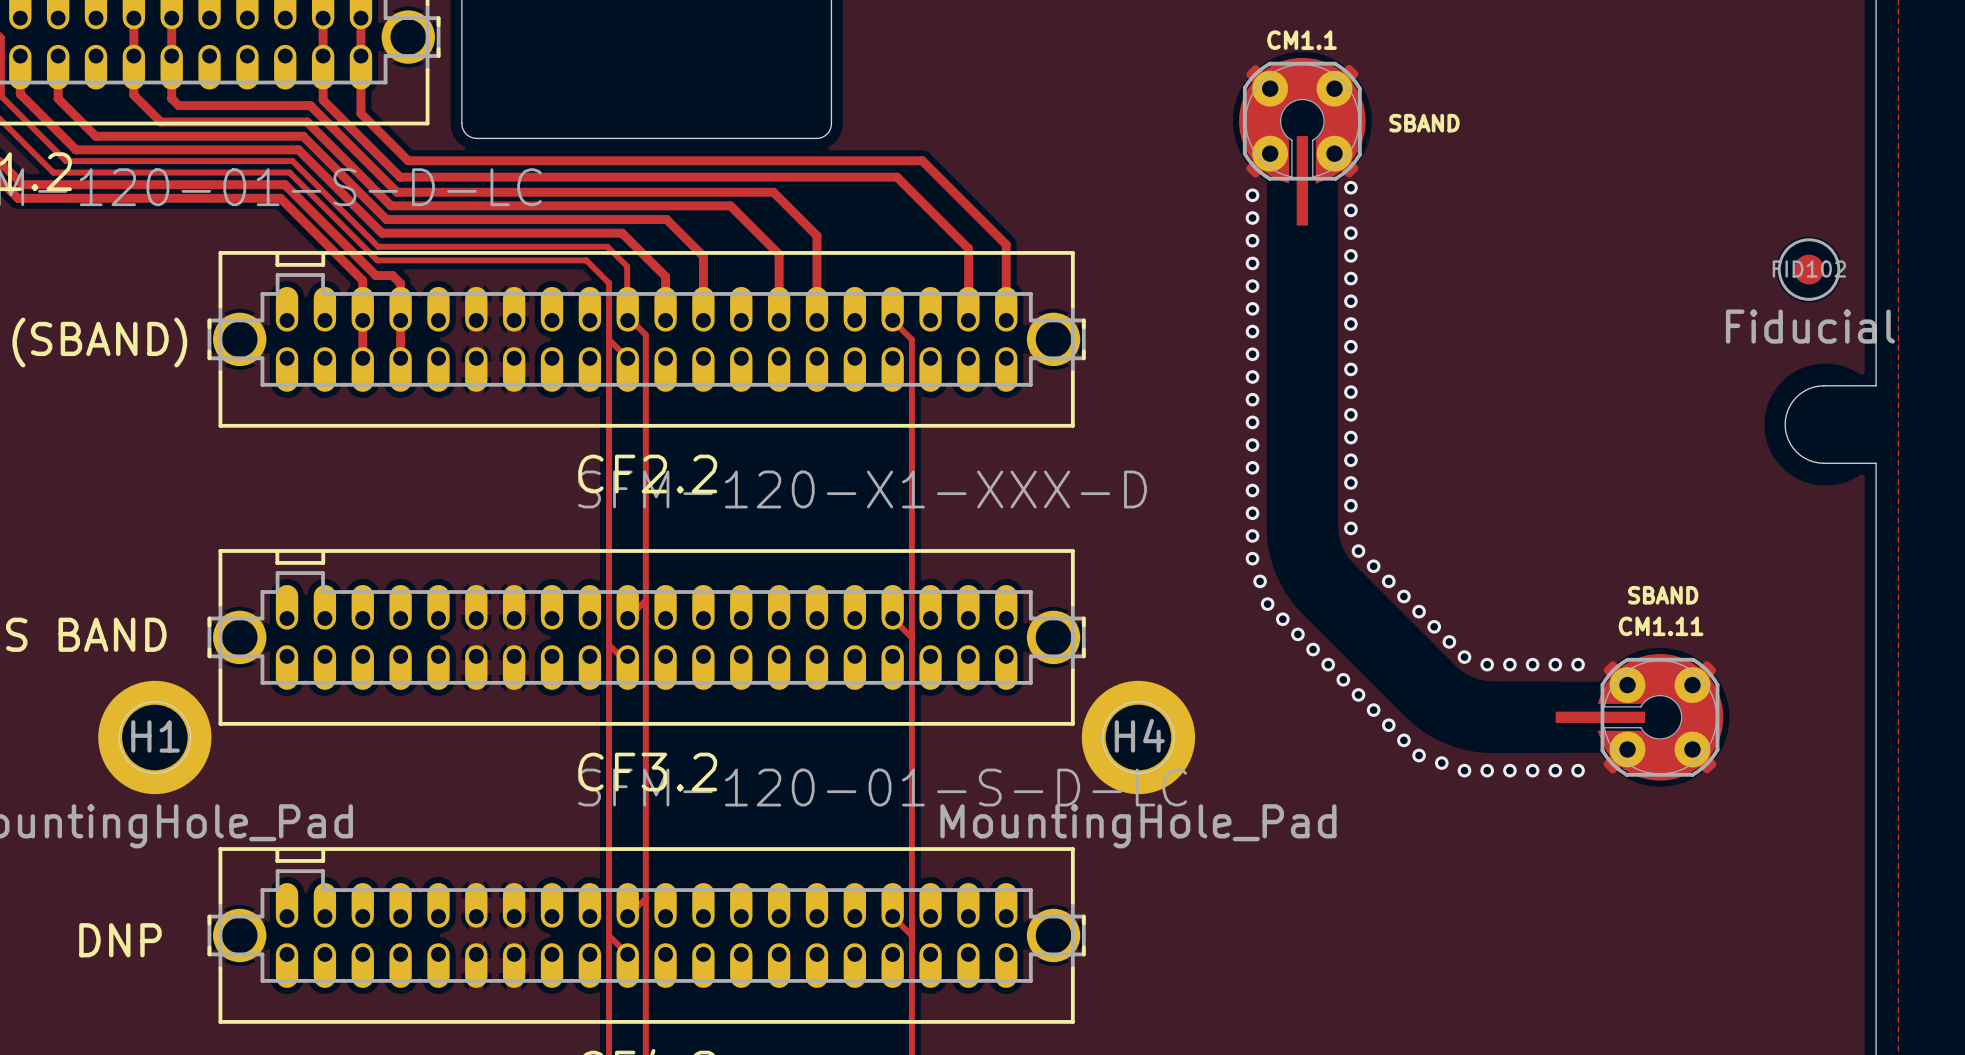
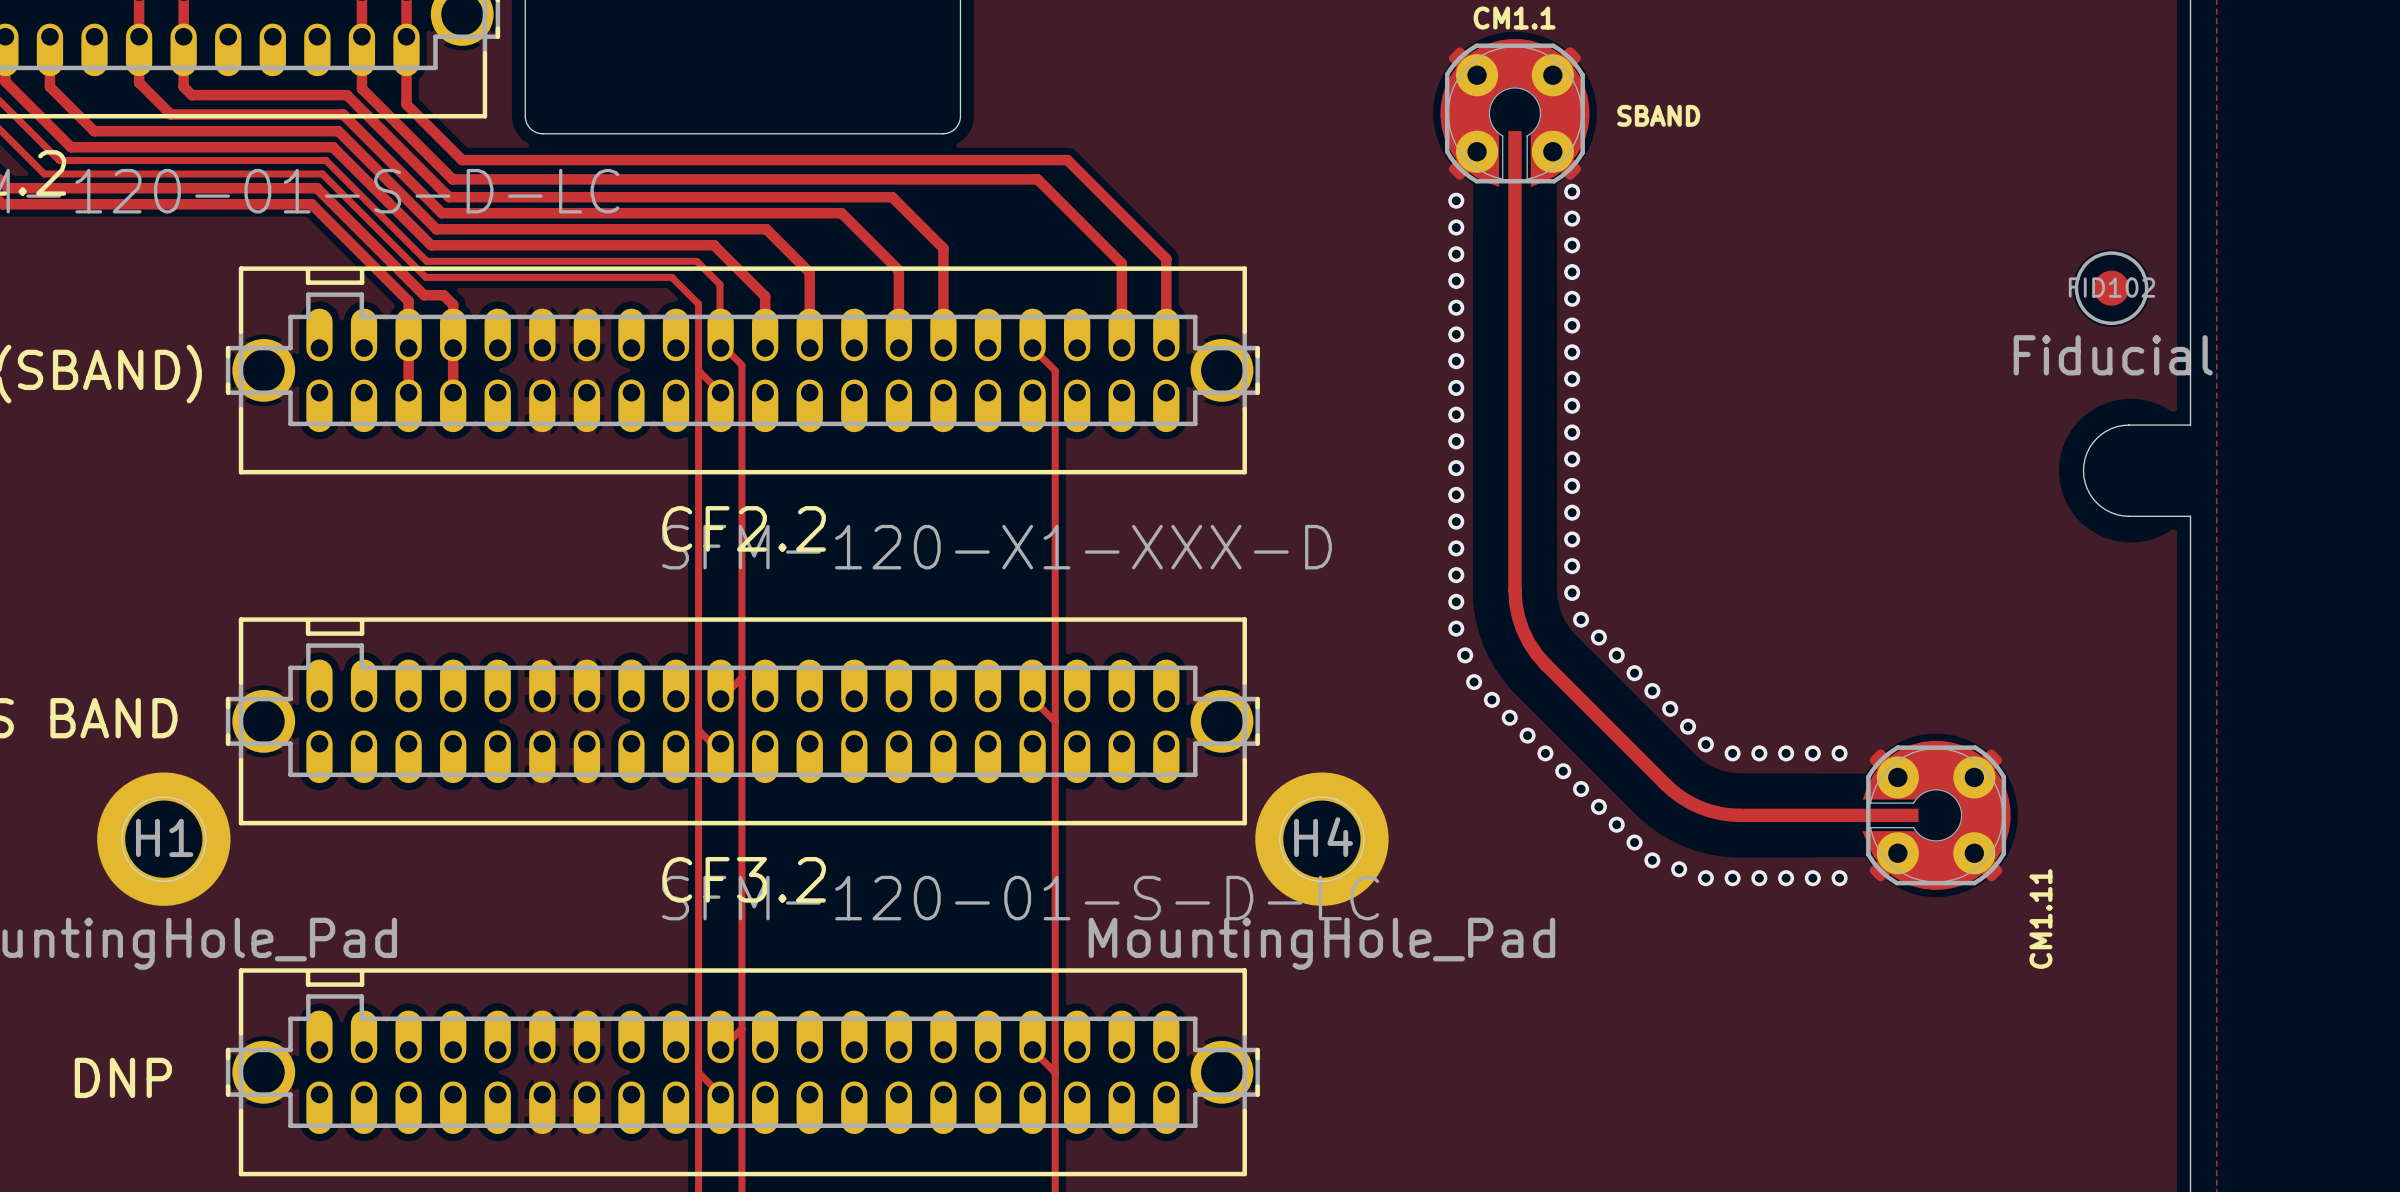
track: none -> (1514, 236) (1514, 590) (1518, 617) (1529, 642) (1545, 664) (1665, 784) (1681, 797) (1709, 810) (1729, 814) (1813, 815)
text: SBAND (1663, 595) -> none
CM1.11 name rotation: 0° (1661, 626) -> 90° counterclockwise (2040, 918)
CM1.11 name position: CM1.11 (1661, 626) -> CM1.11 (2040, 918)

